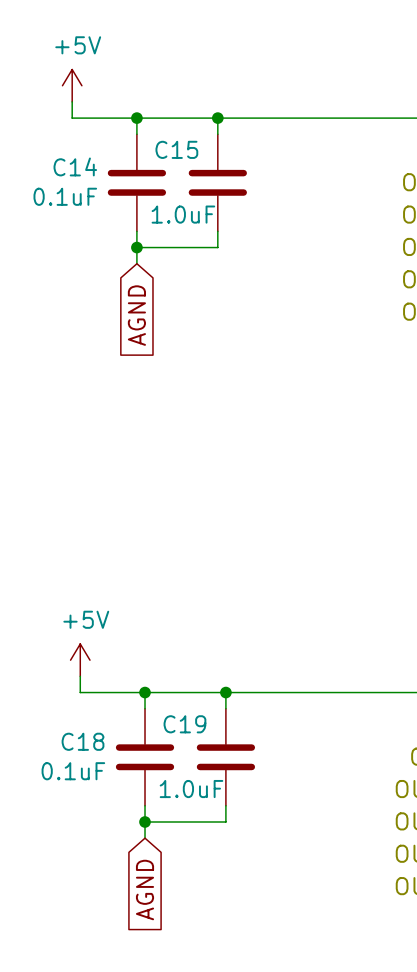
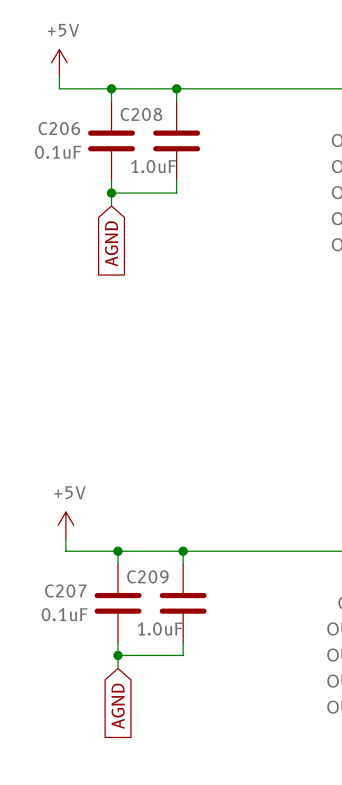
C15 name: C15 (176, 149) -> C208 (141, 114)
C14 name: C14 (75, 166) -> C206 (59, 128)
C19 name: C19 (184, 724) -> C209 (147, 576)
C18 name: C18 (83, 741) -> C207 (65, 590)

